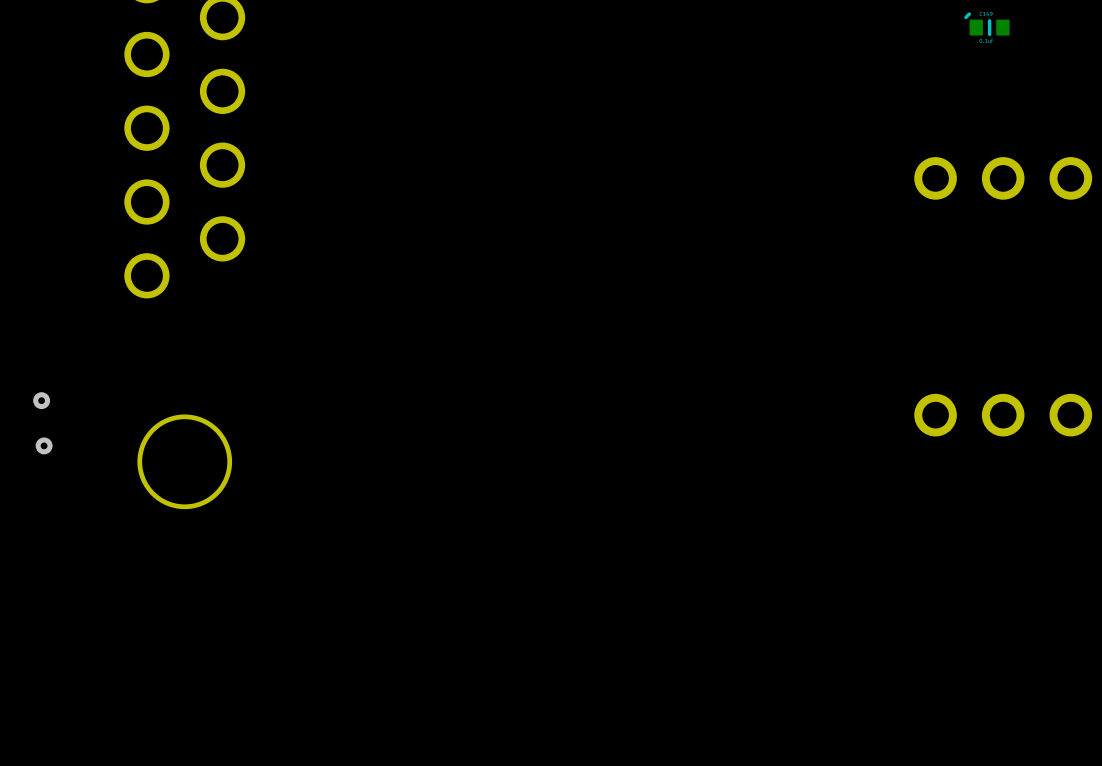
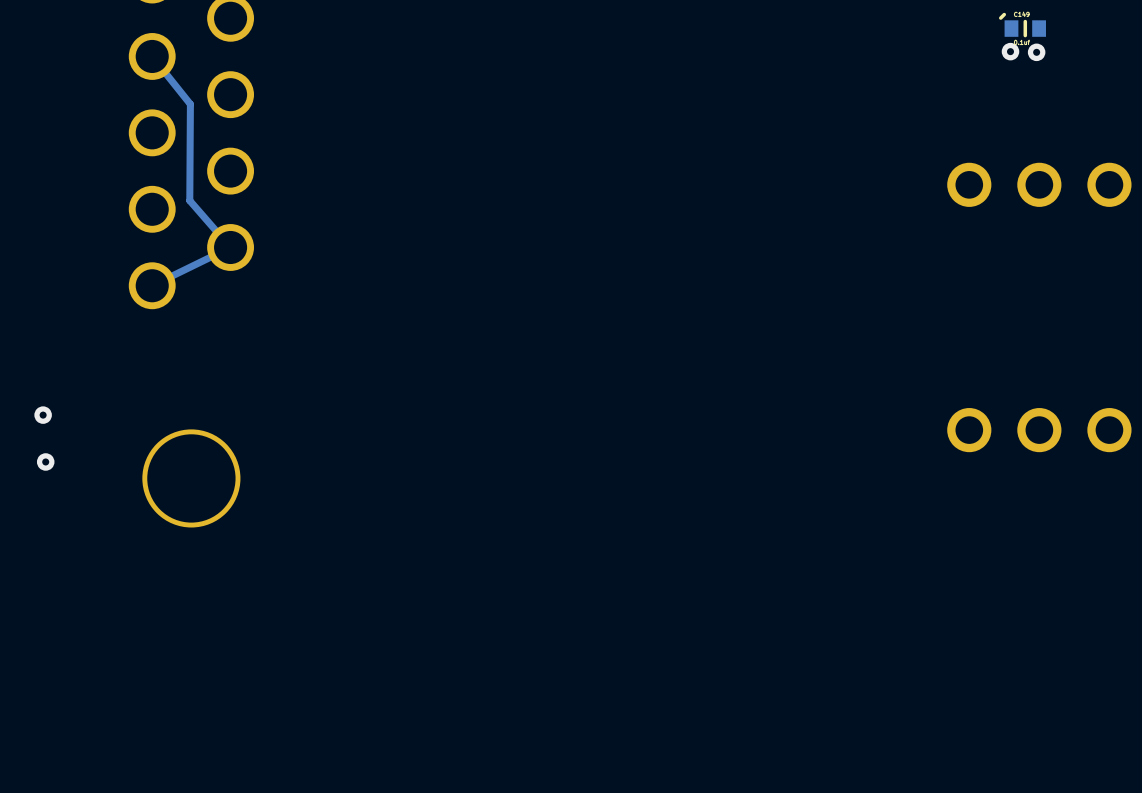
via: none -> (1010, 51)
via: none -> (1036, 52)
track: none -> (152, 56) (190, 104) (189, 200) (230, 247) (152, 285)

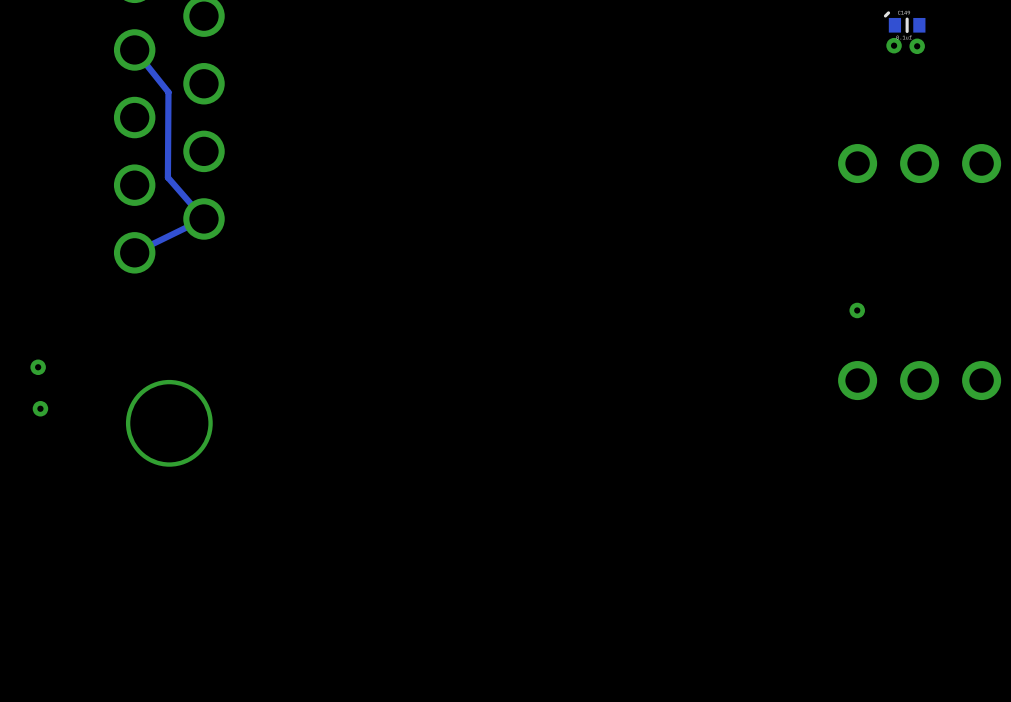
via: none -> (857, 310)

